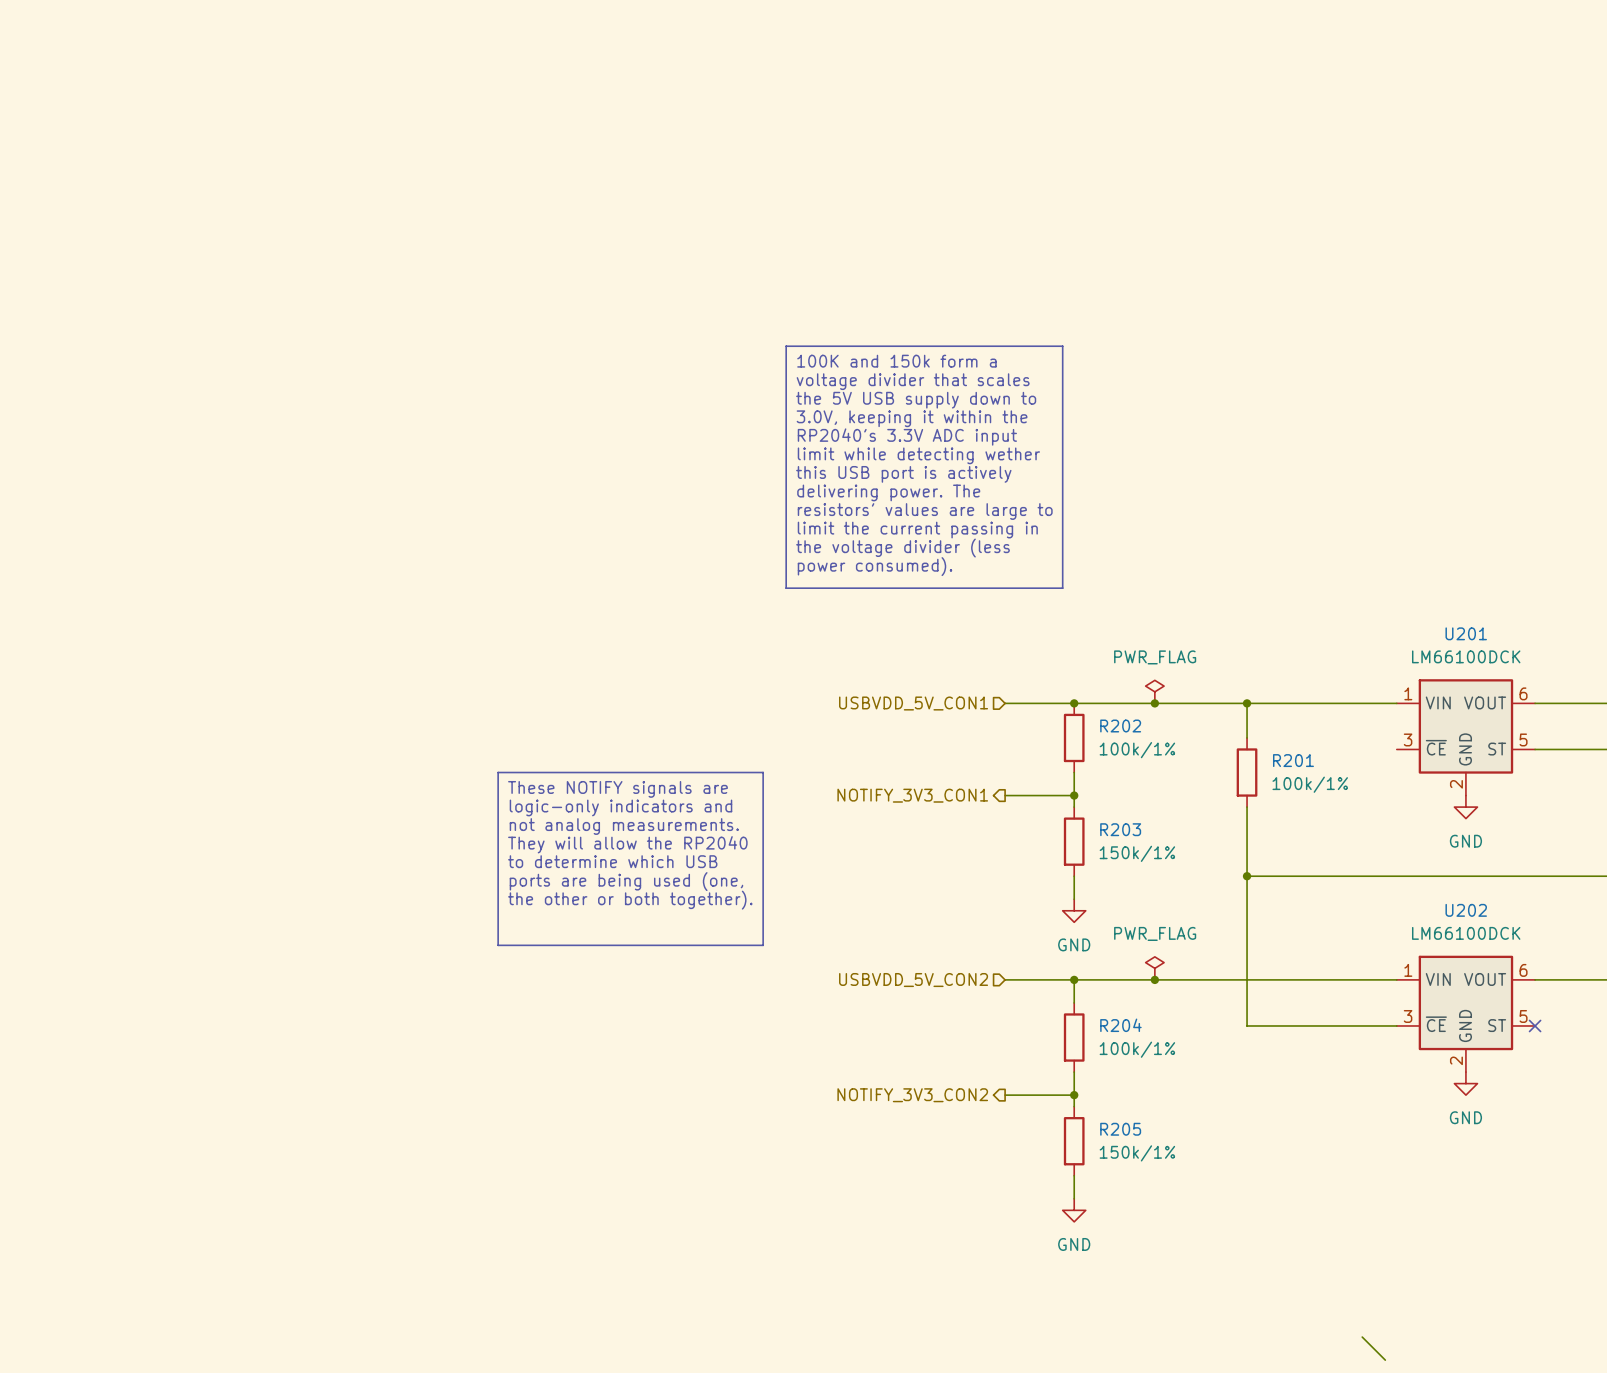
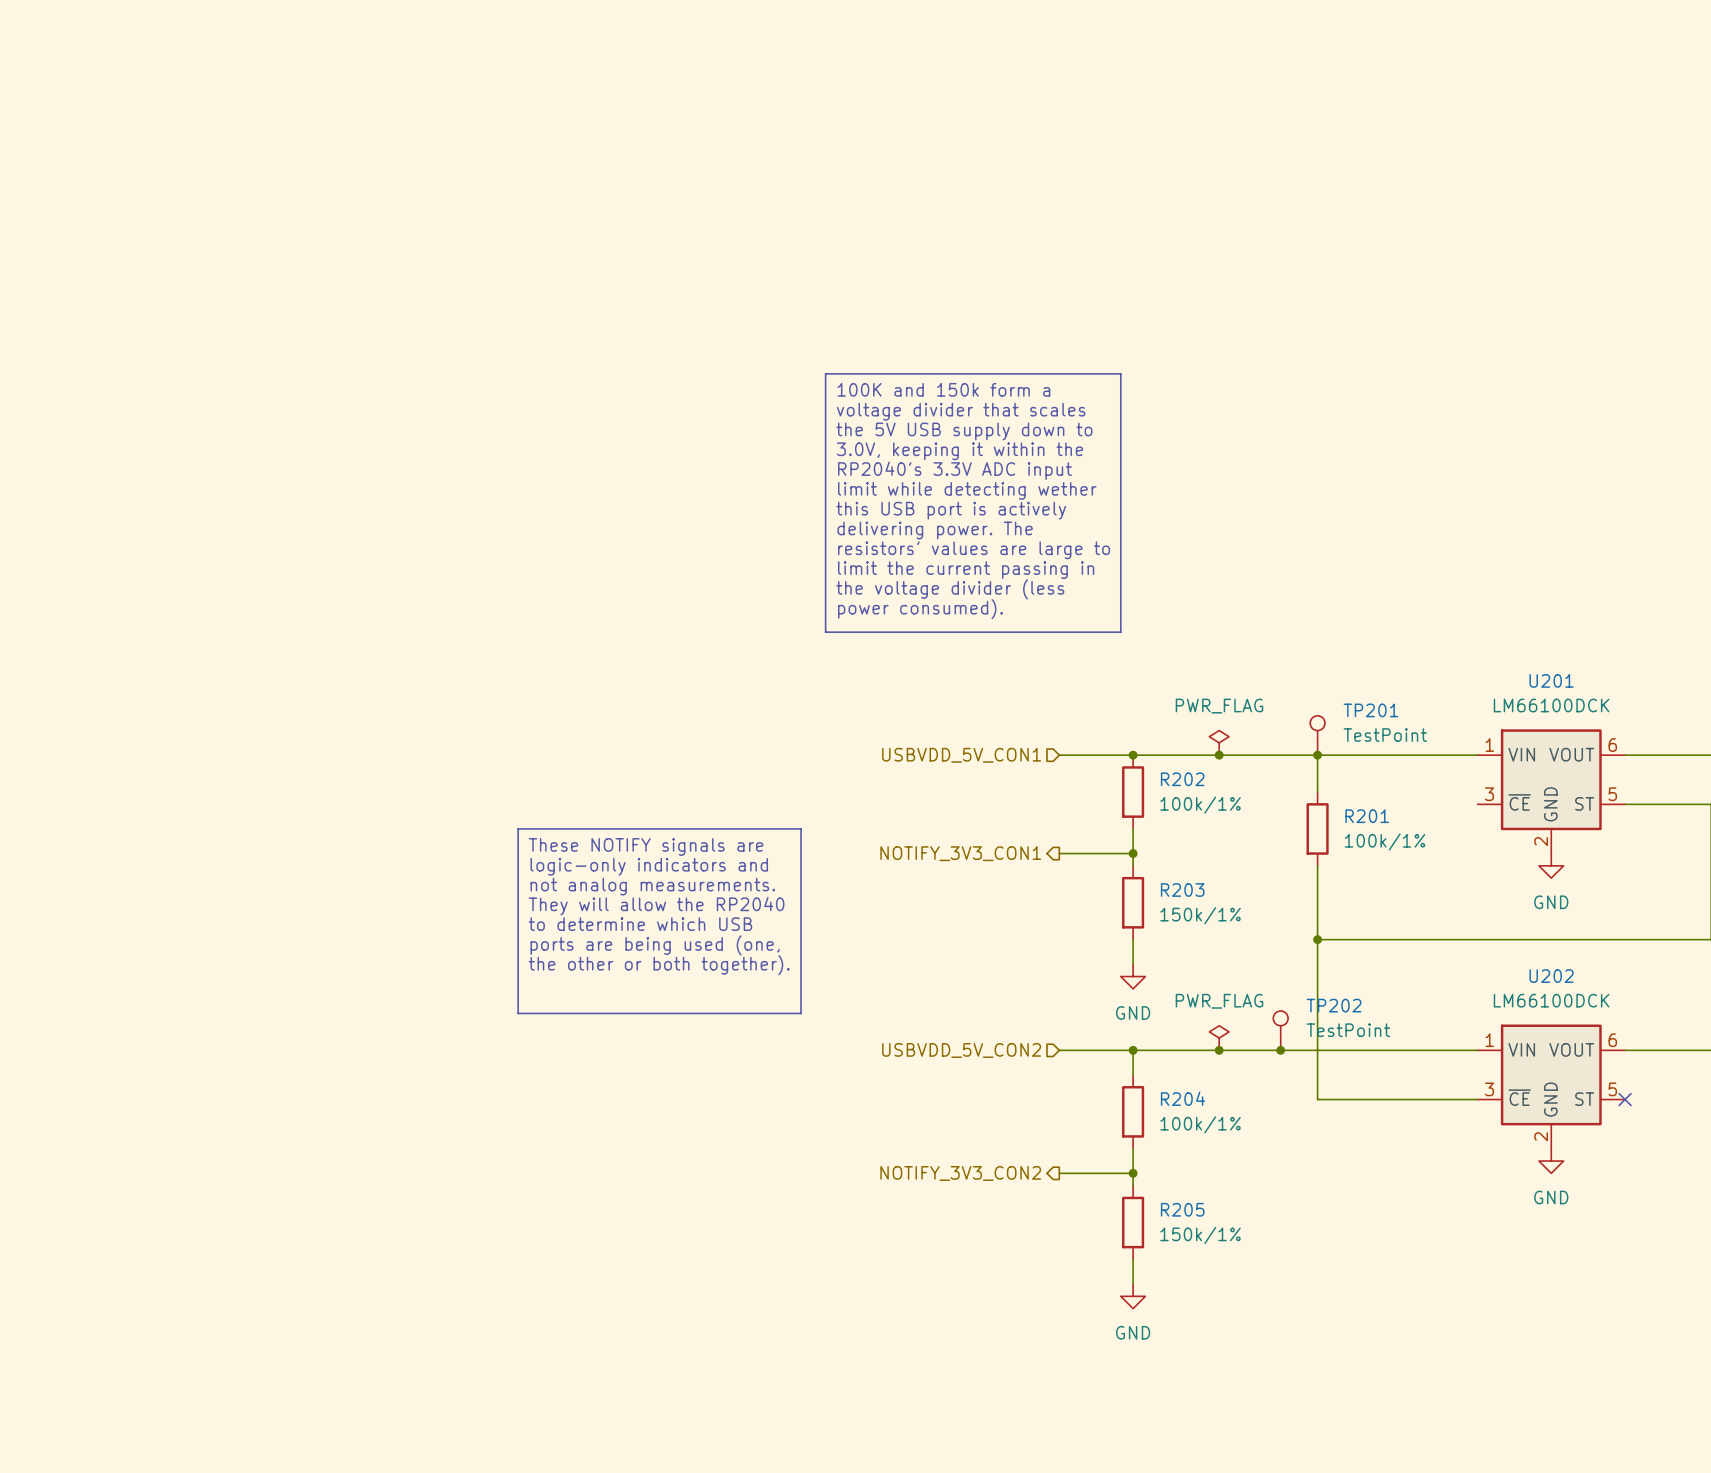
TP201: none -> TestPoint (1317, 735)
TP202: none -> TestPoint (1280, 1030)
junction: none -> (1280, 1050)
wire: (1362, 1337) (1385, 1360) -> none

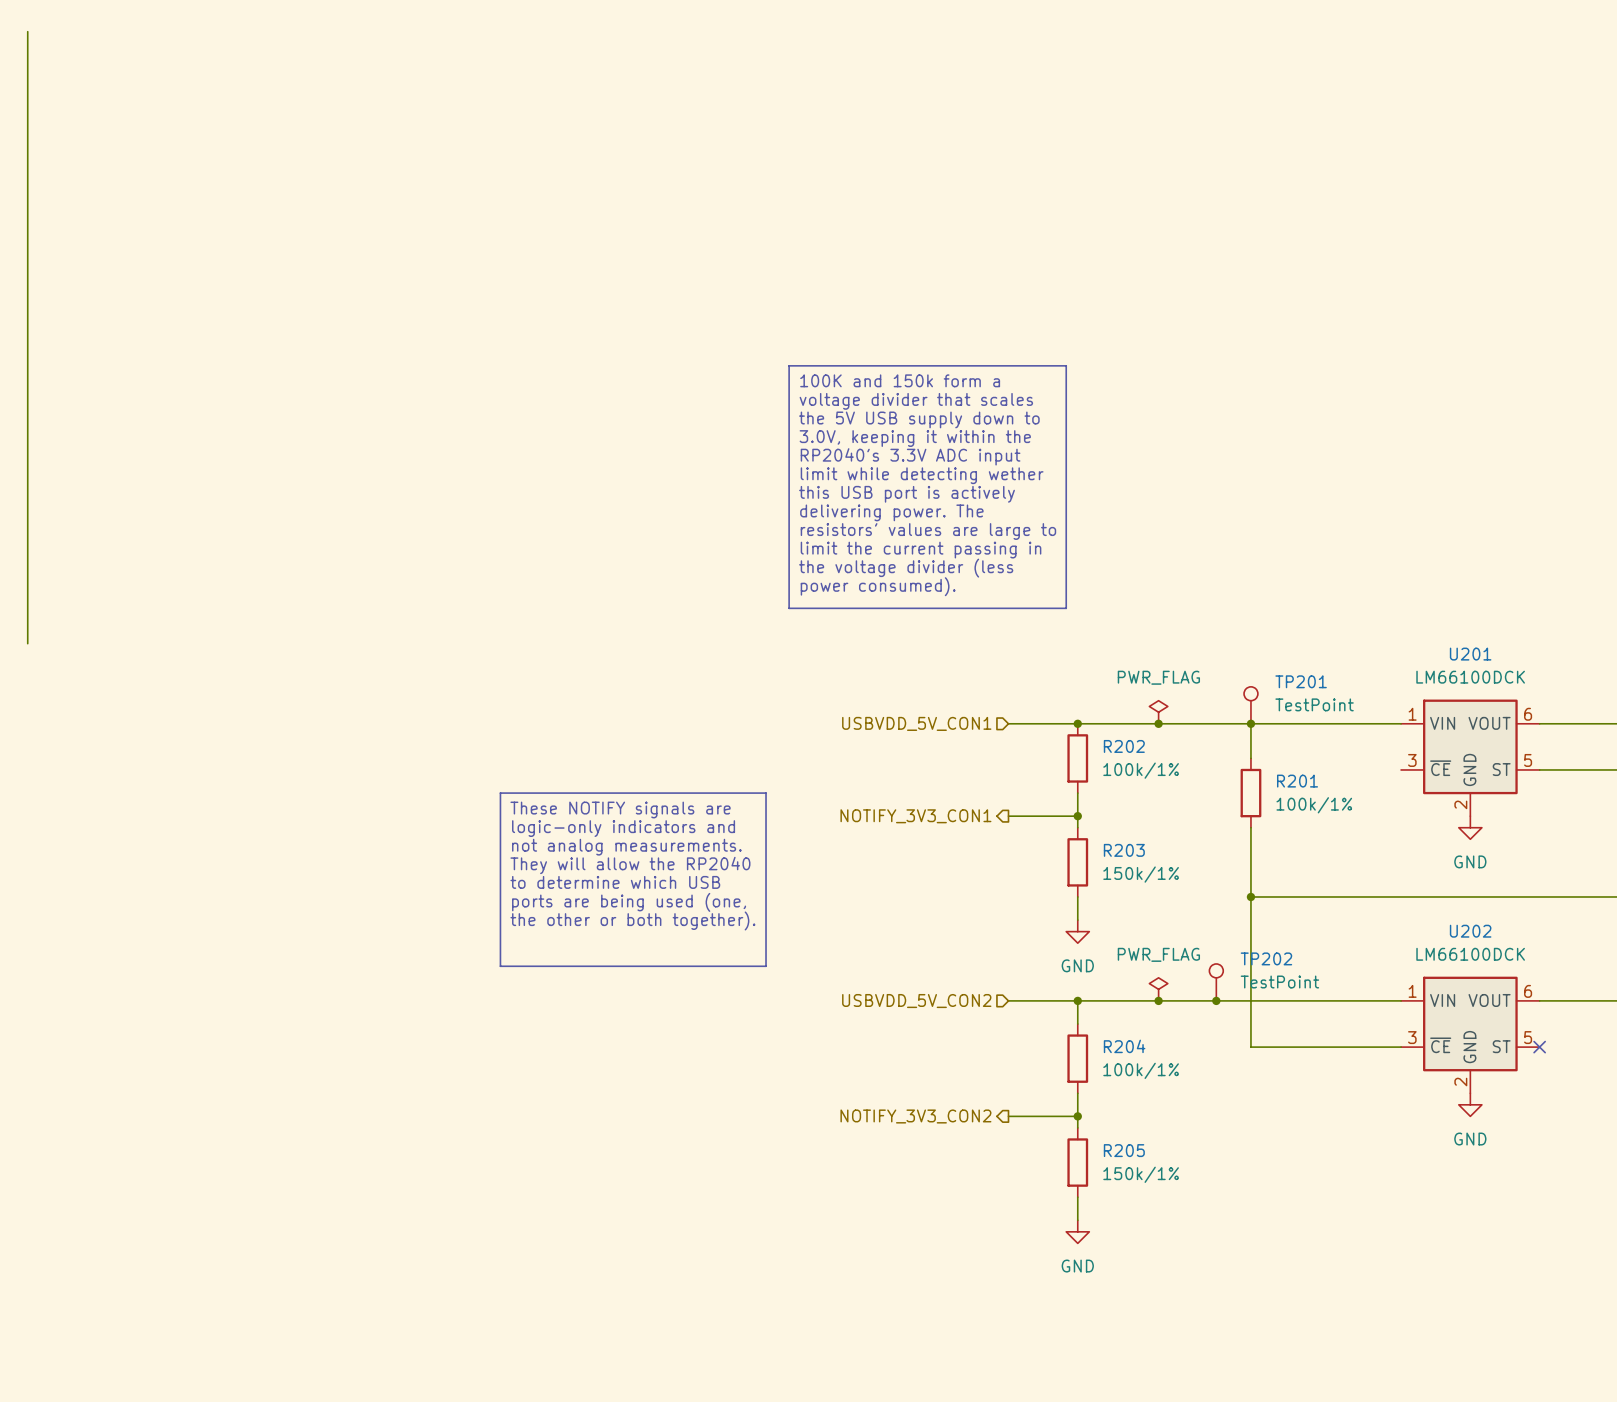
wire: none -> (27, 31) (27, 643)

